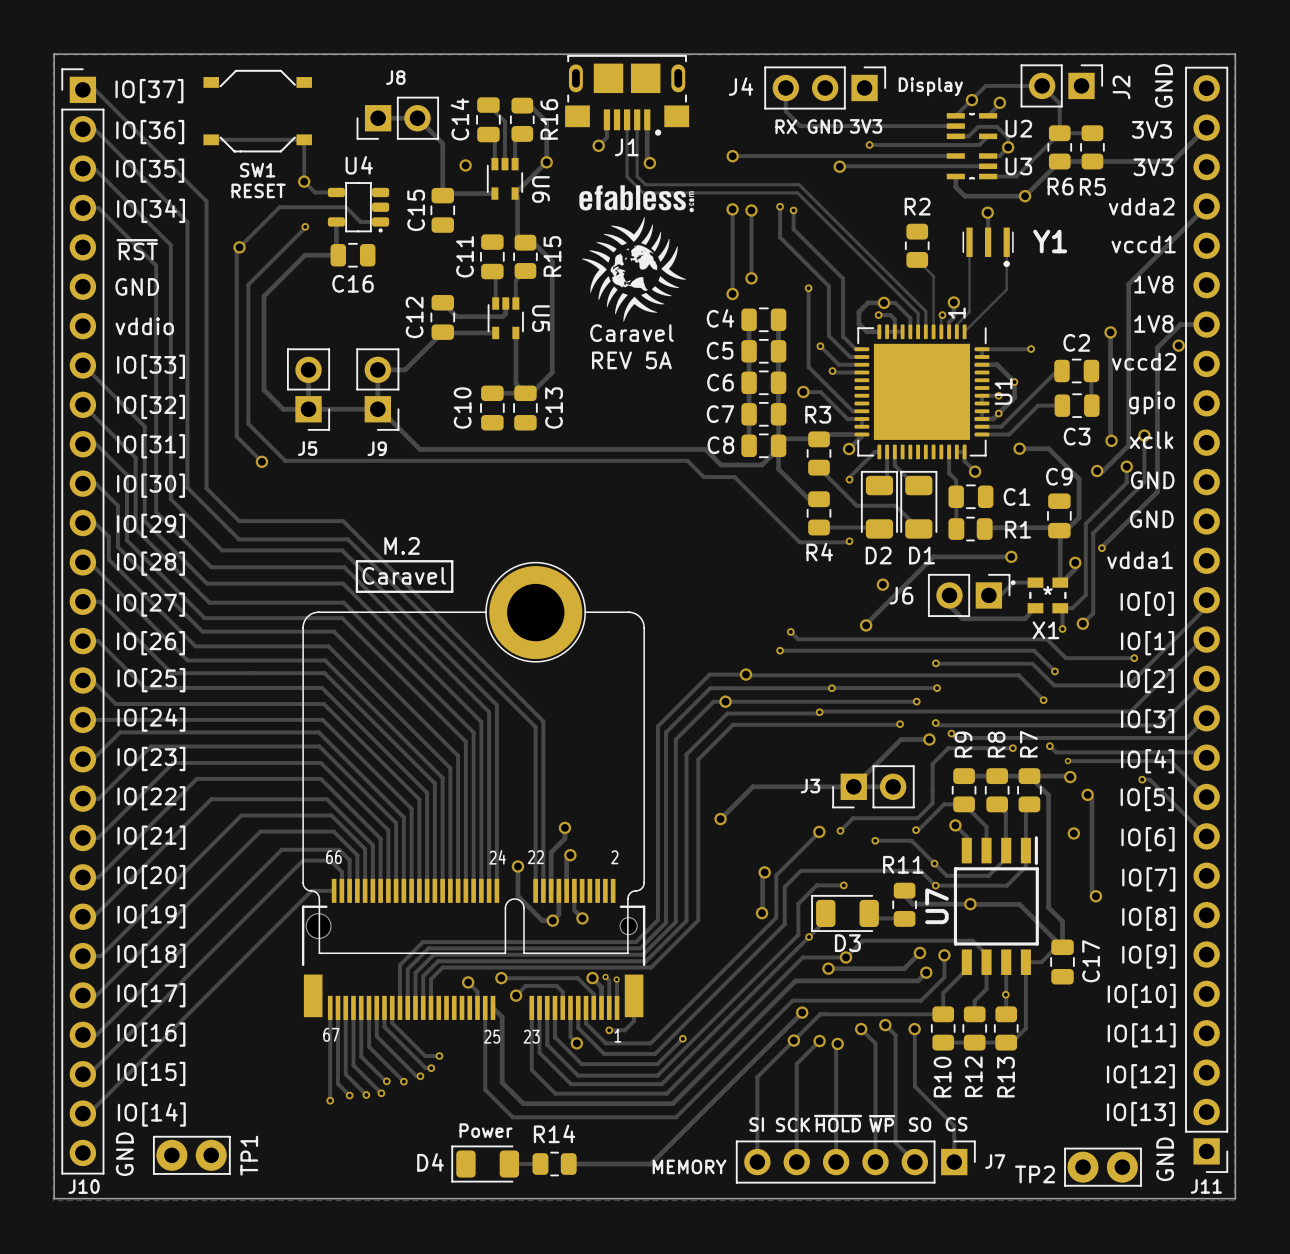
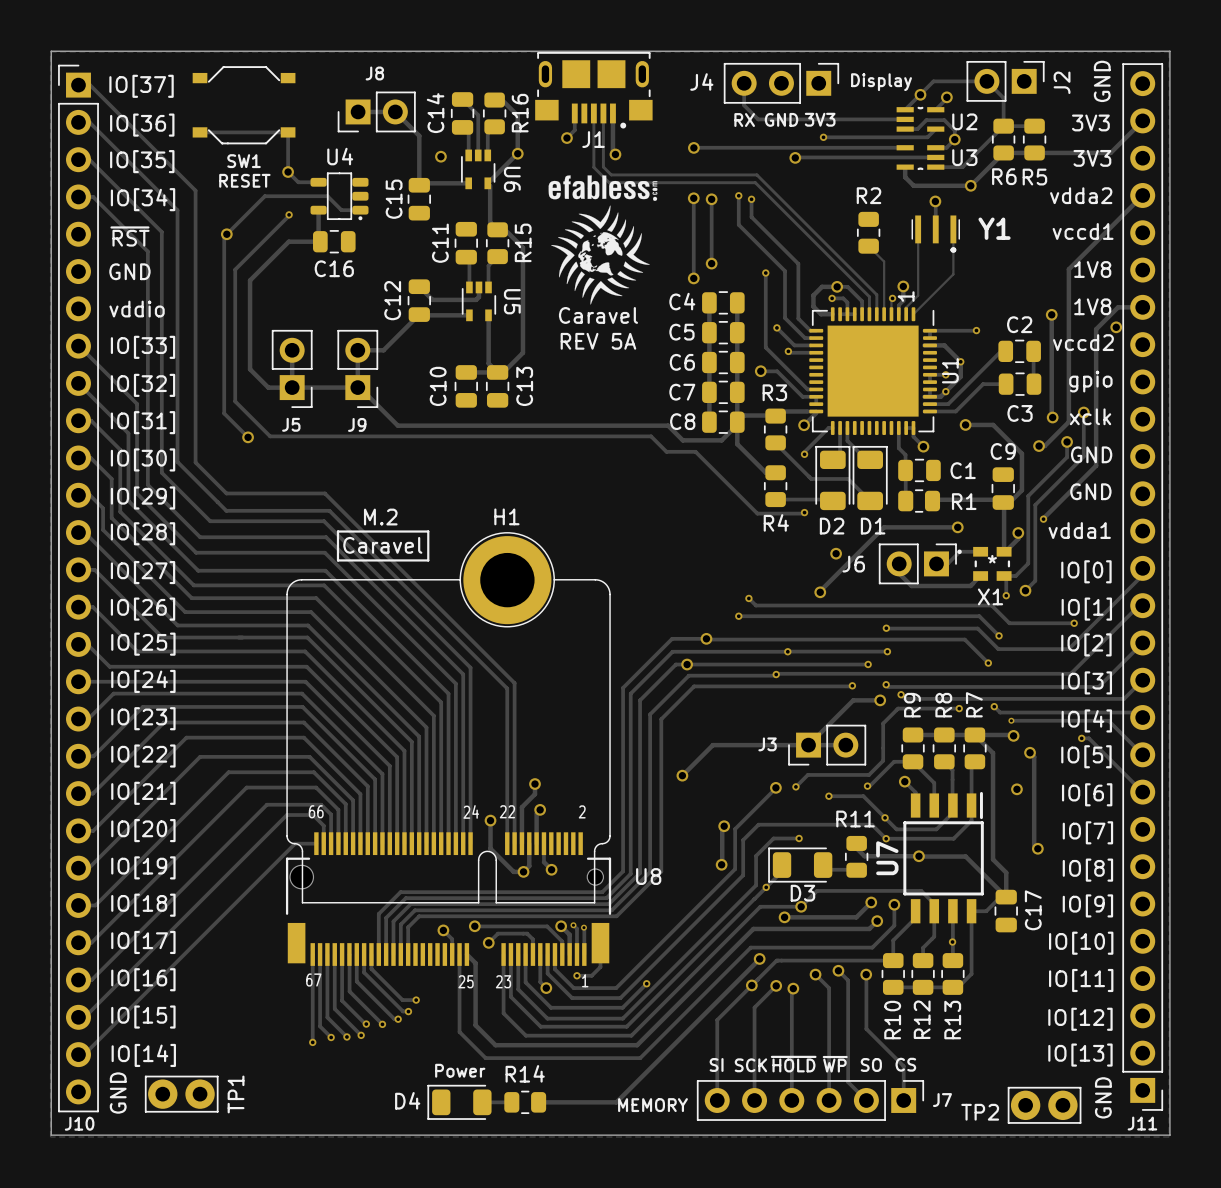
H1 name: none -> H1 (506, 516)
U8 name: none -> U8 (648, 876)

